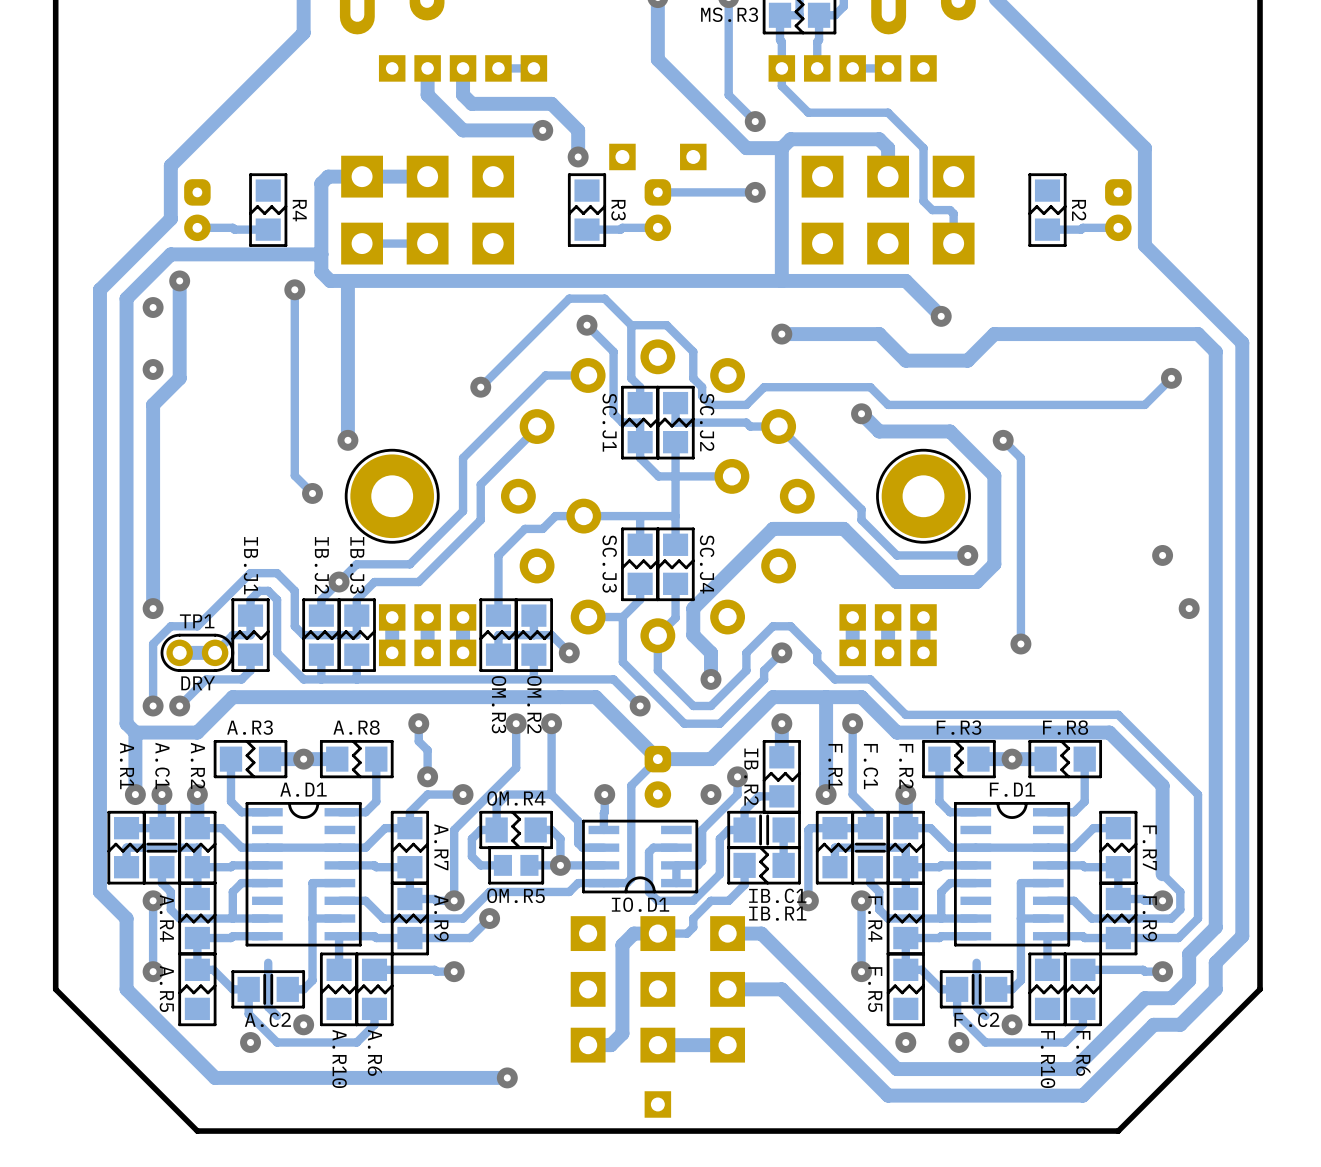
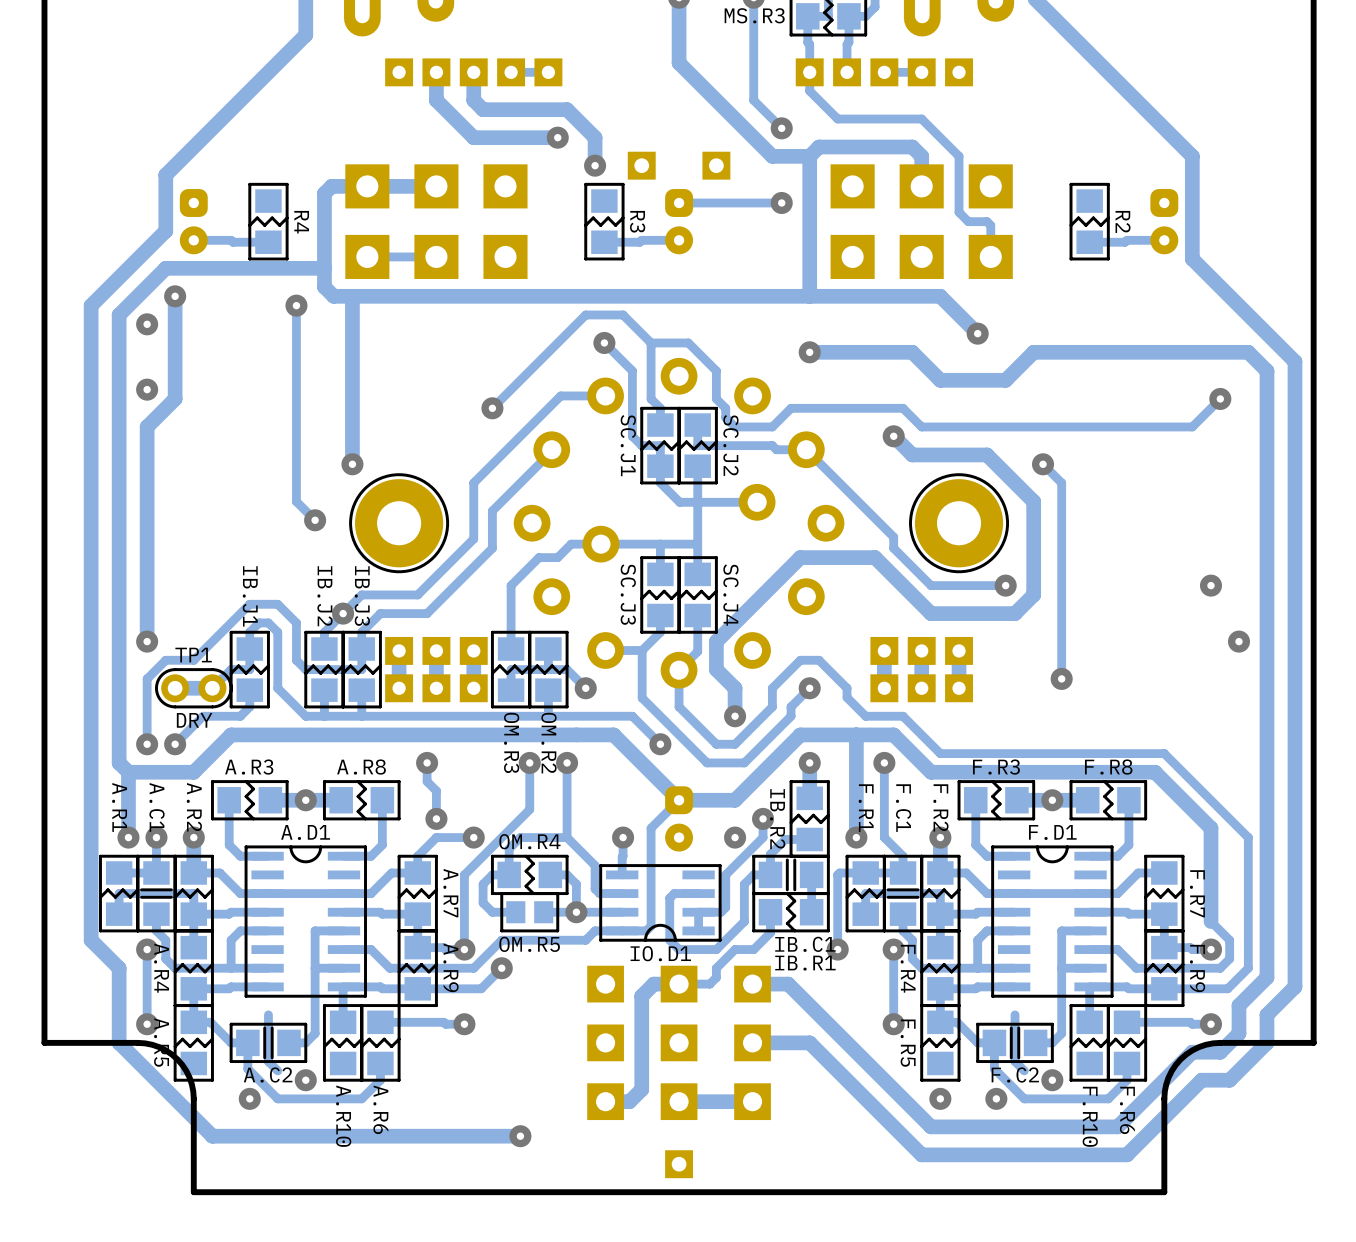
board edge: (55, 989) (197, 1131) -> (44, 1042) (145, 1043) (165, 1050) (177, 1059) (186, 1070) (193, 1091) (193, 1192)
board edge: (1260, 989) (1118, 1131) -> (1313, 1042) (1213, 1043) (1192, 1050) (1180, 1059) (1168, 1077) (1164, 1091) (1164, 1192)

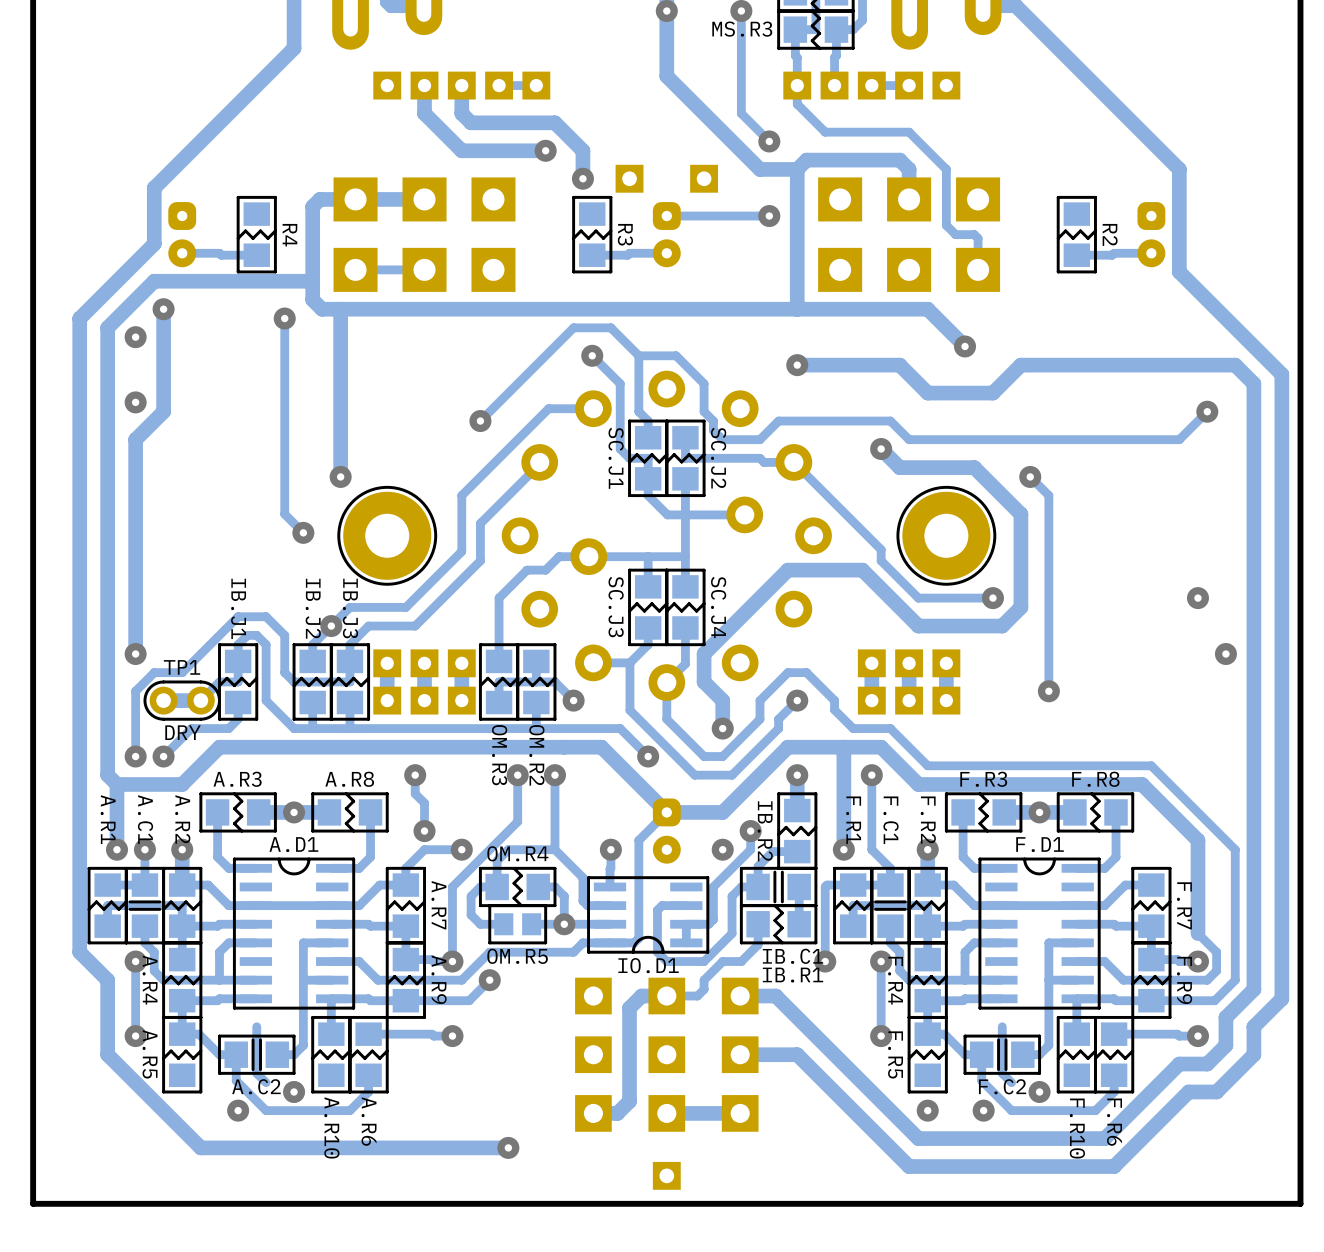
board edge: (44, 1042) (145, 1043) (165, 1050) (177, 1059) (186, 1070) (193, 1091) (193, 1192) -> (33, 1054) (33, 1203) (182, 1203)
board edge: (1313, 1042) (1213, 1043) (1192, 1050) (1180, 1059) (1168, 1077) (1164, 1091) (1164, 1192) -> (1300, 1054) (1300, 1203) (1151, 1203)

